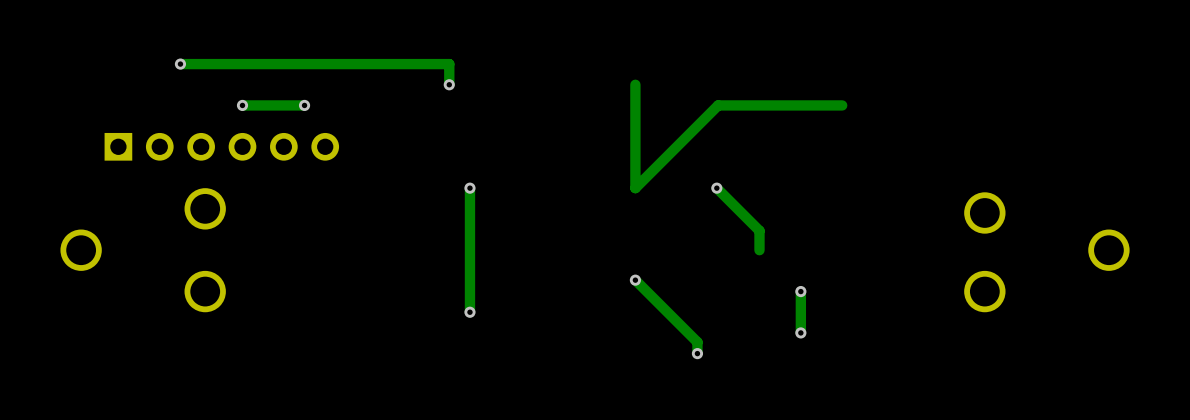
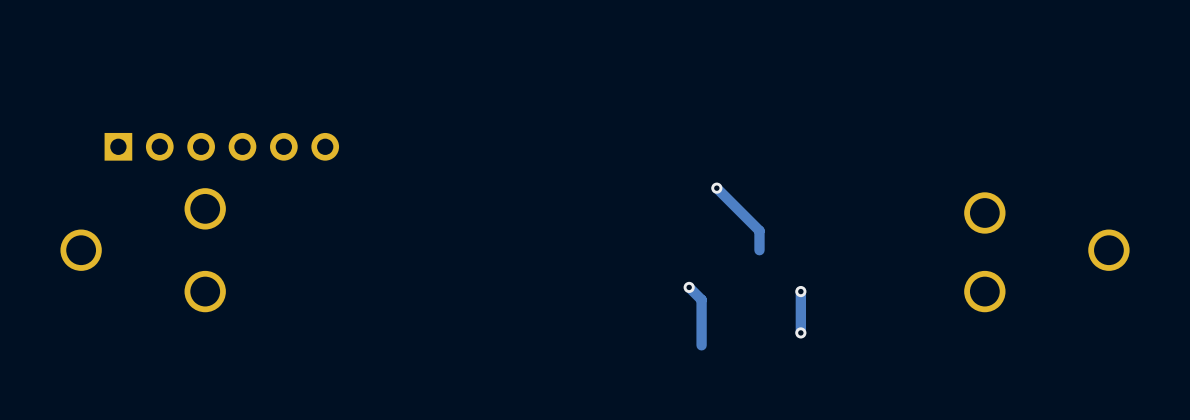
track: (180, 64) (449, 64) (449, 84) -> none
via: (180, 64) -> none
via: (449, 84) -> none
track: (635, 84) (635, 188) (718, 105) (842, 105) -> none
via: (242, 105) -> none
track: (304, 105) (242, 105) -> none
via: (304, 105) -> none
track: (469, 188) (469, 312) -> none
via: (469, 188) -> none
track: (635, 280) (697, 342) (697, 353) -> none
via: (635, 280) -> none
track: none -> (689, 287) (701, 299) (701, 345)
via: none -> (689, 287)
via: (469, 312) -> none
via: (697, 353) -> none

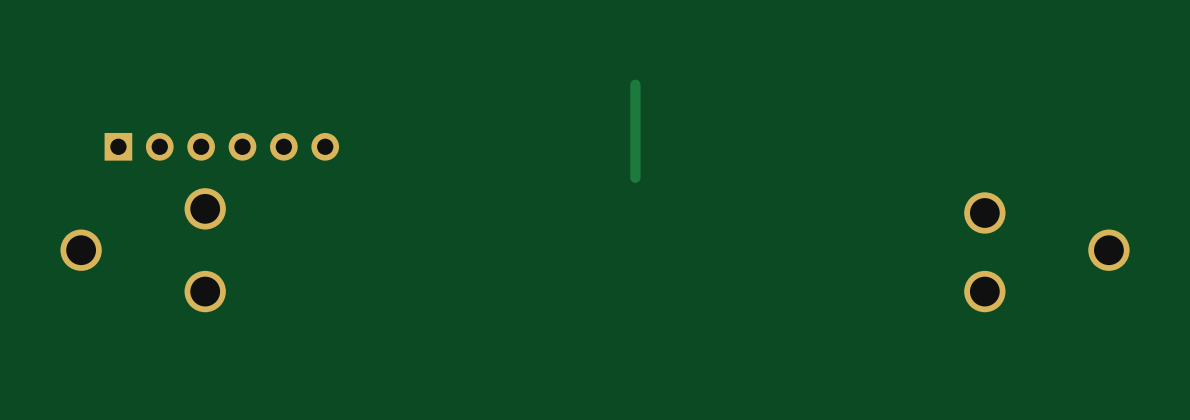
track: none -> (635, 84) (635, 177)
track: (716, 188) (759, 230) (759, 250) -> none
via: (716, 188) -> none
track: (689, 287) (701, 299) (701, 345) -> none
via: (689, 287) -> none
track: (800, 291) (800, 332) -> none
via: (800, 291) -> none
via: (800, 332) -> none

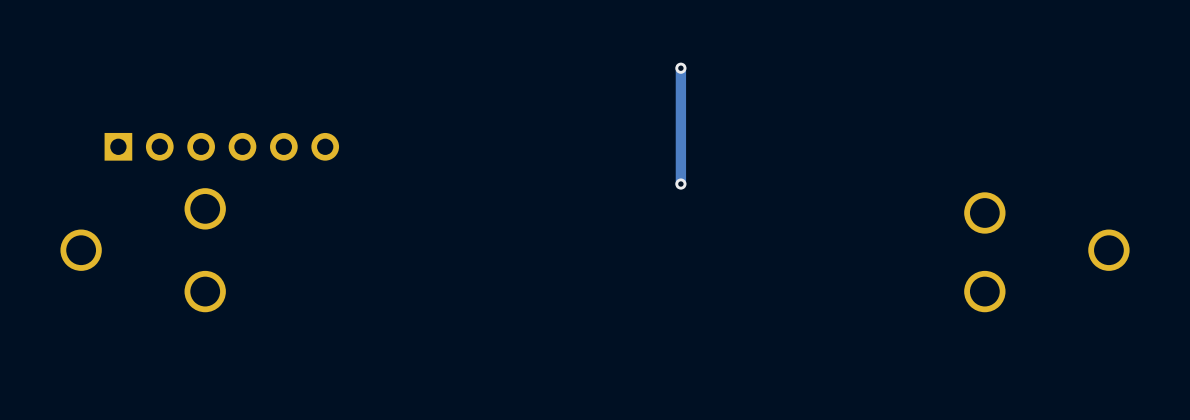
track: none -> (680, 68) (680, 184)
via: none -> (680, 68)
track: (635, 84) (635, 177) -> none
via: none -> (680, 184)

